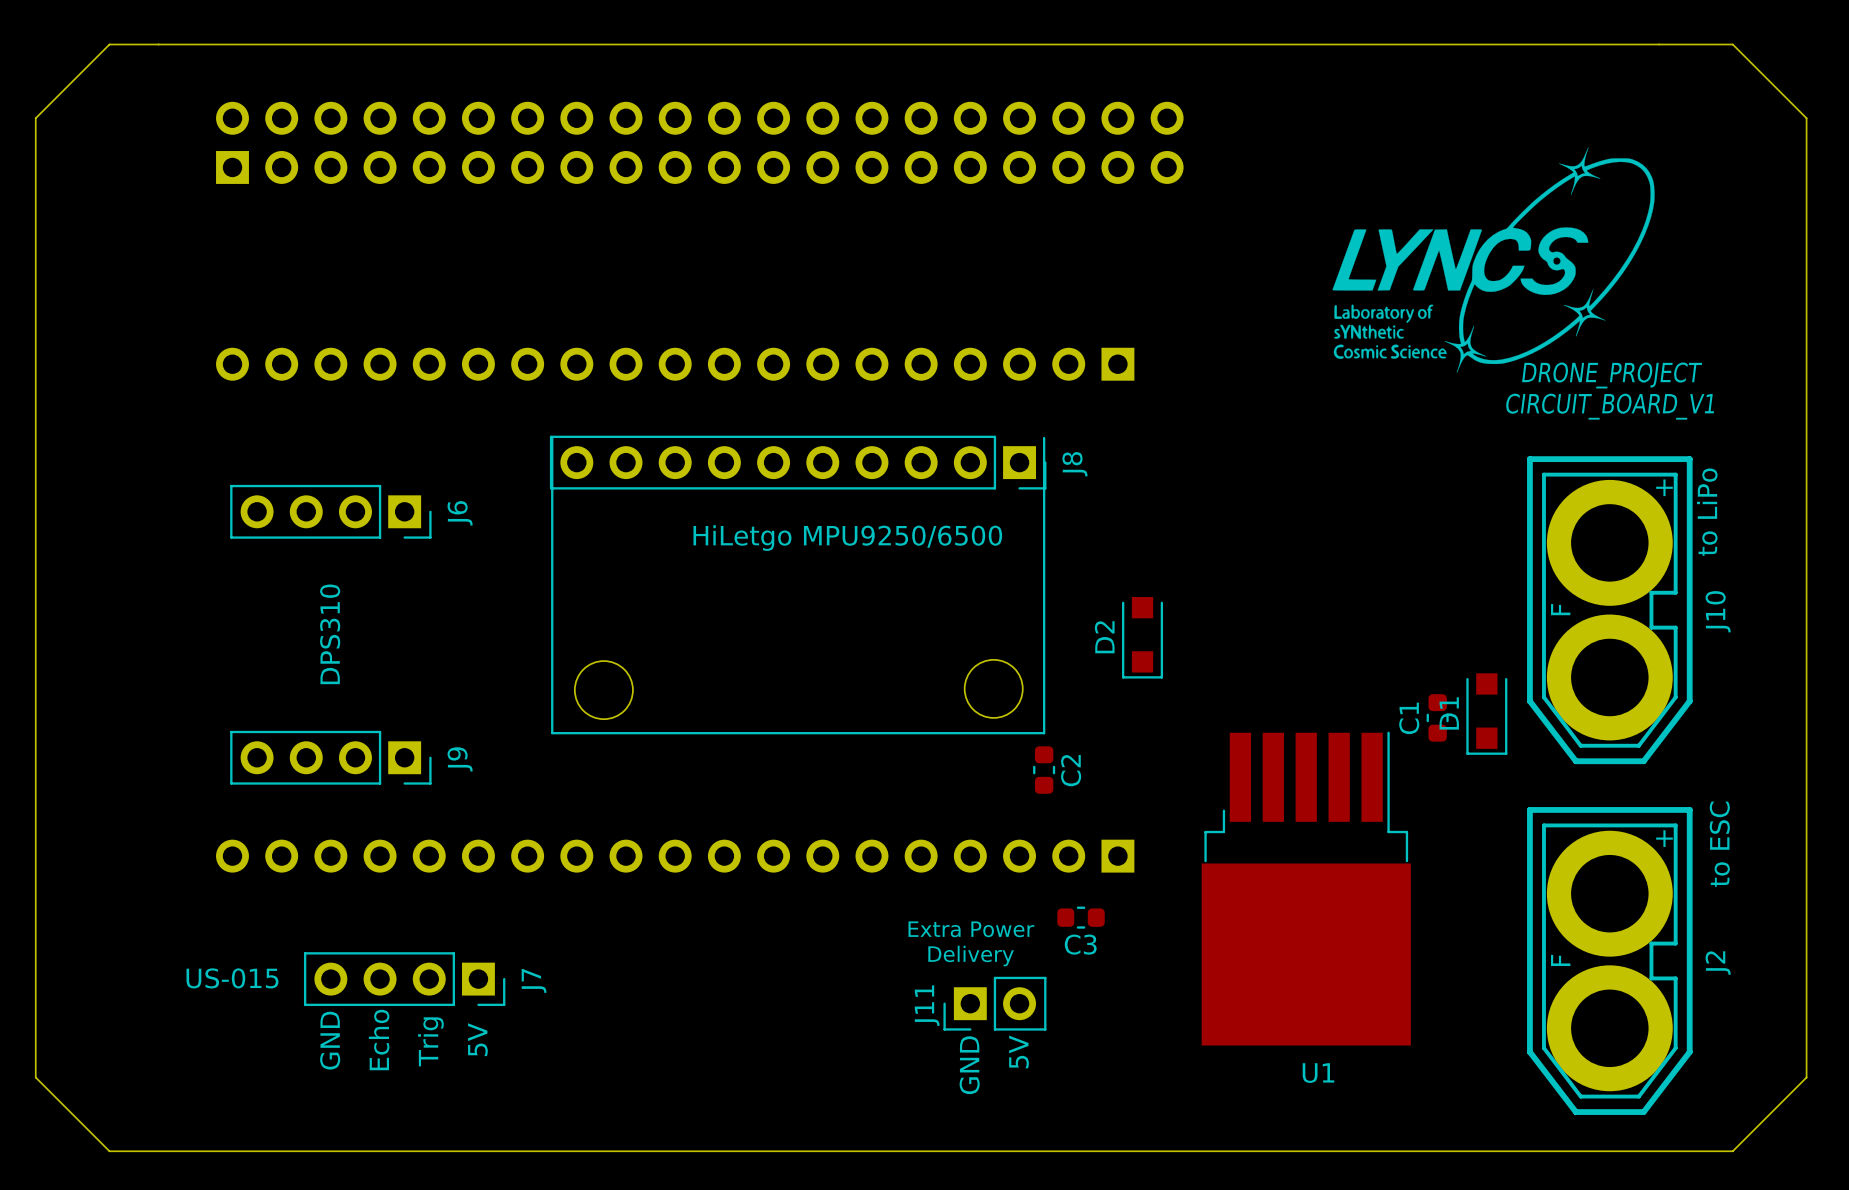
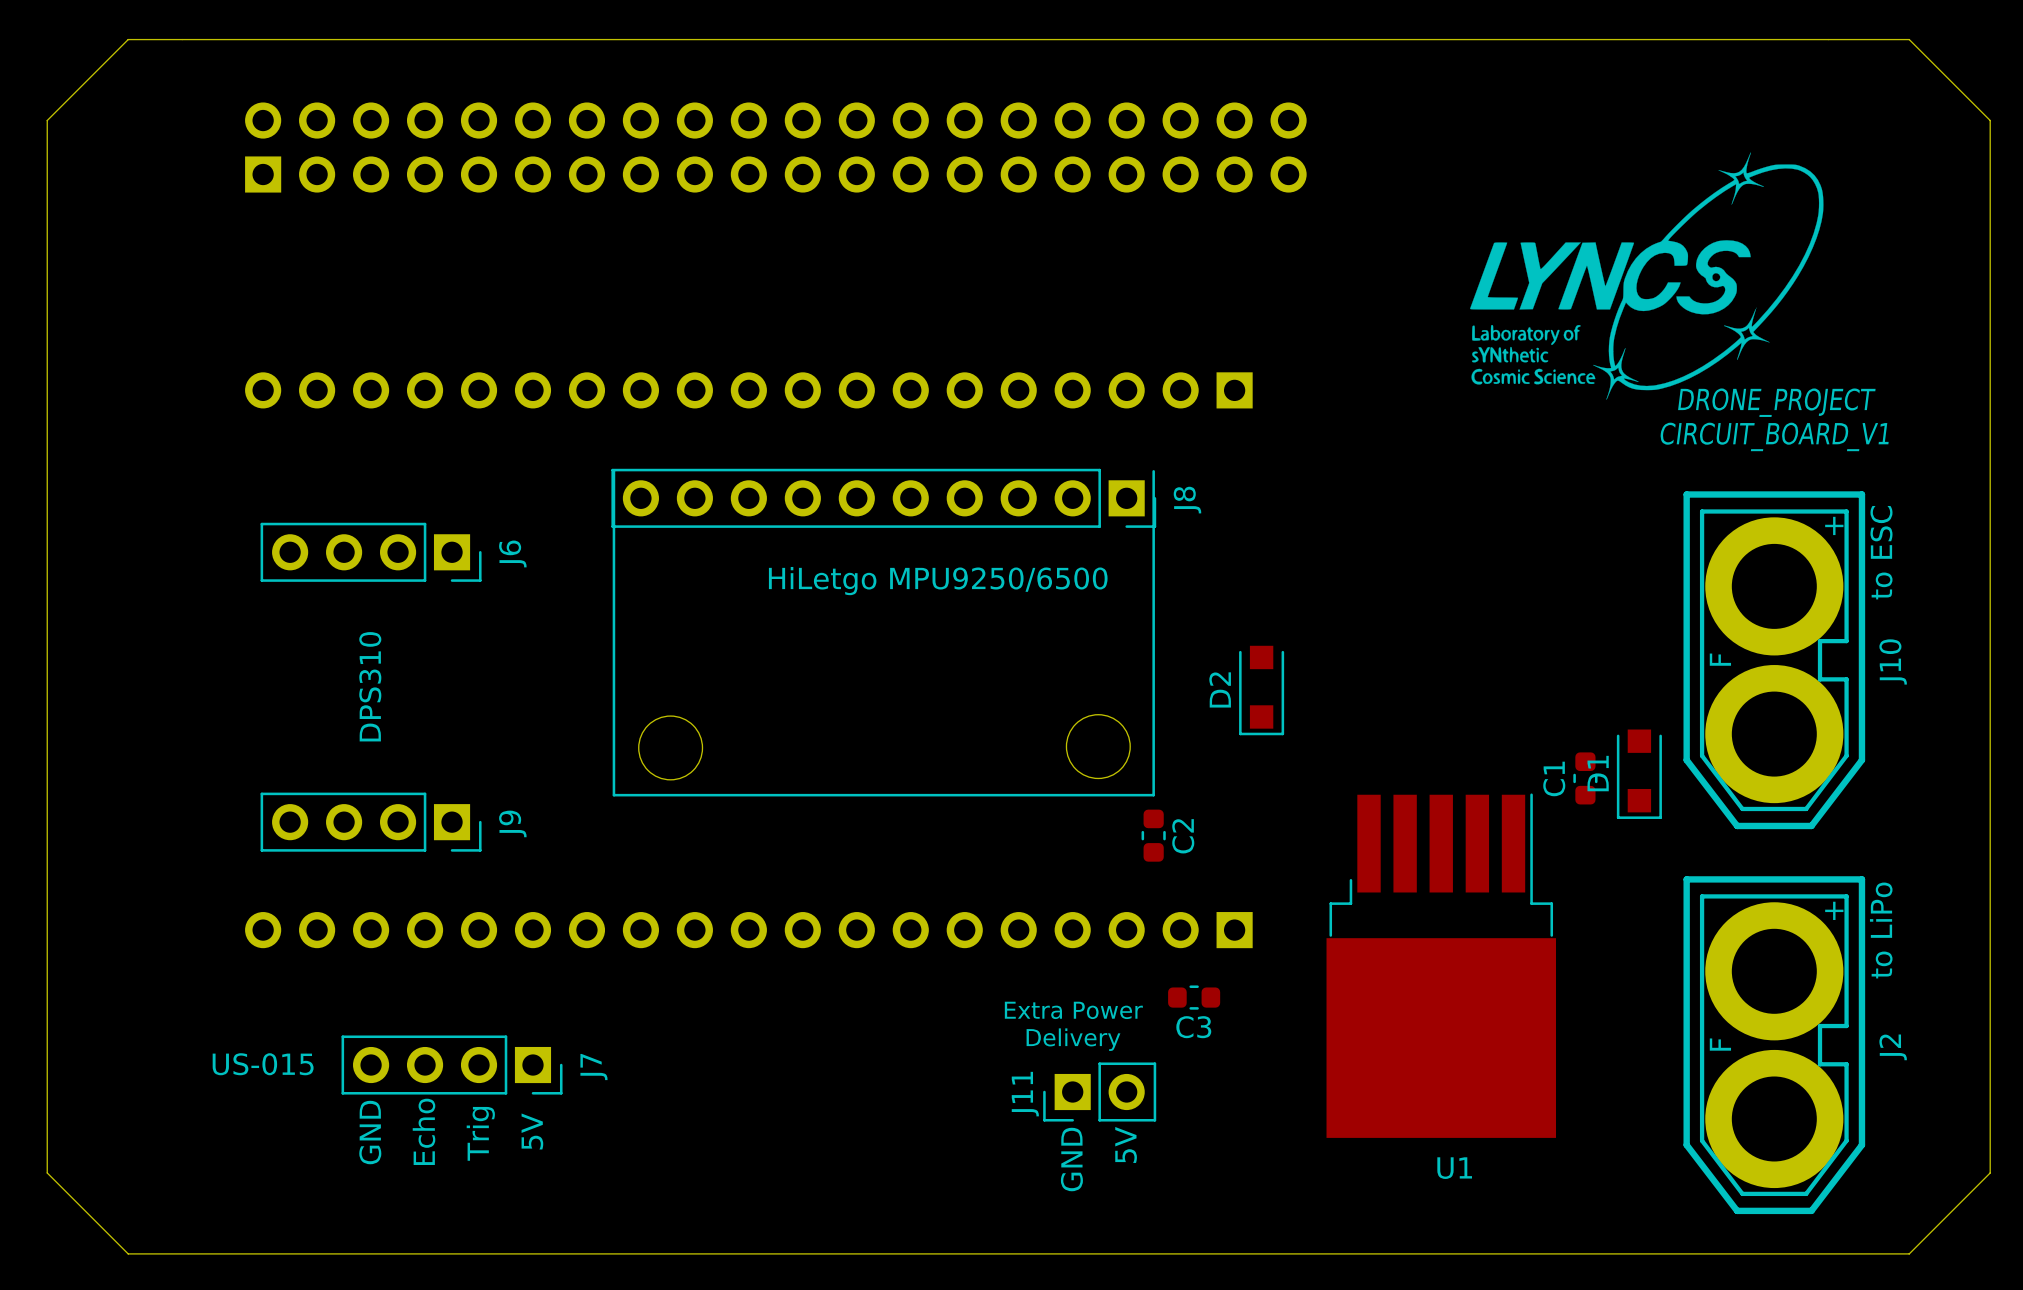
text: to LiPo (1707, 512) -> to ESC (1881, 552)
text: to ESC (1719, 844) -> to LiPo (1881, 930)

